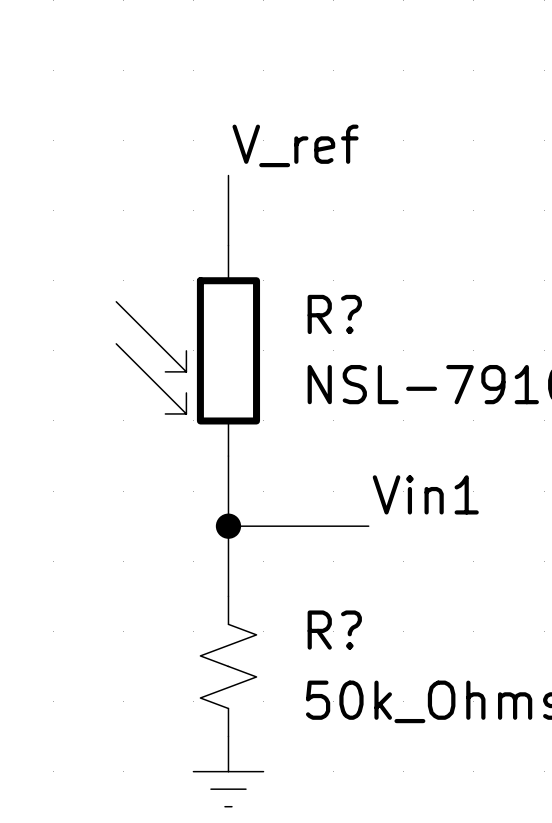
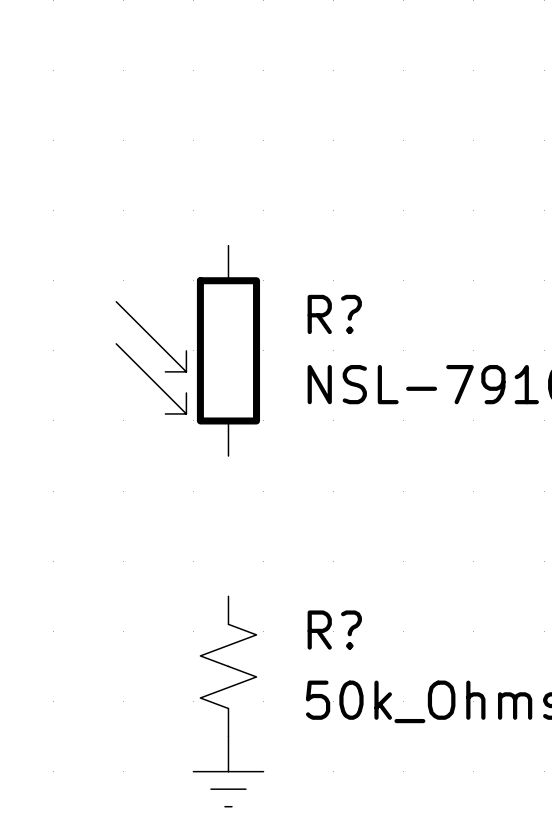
label: V_ref (295, 145) -> none
wire: (228, 175) (228, 245) -> none
wire: (228, 456) (228, 596) -> none
label: Vin1 (425, 494) -> none
wire: (228, 526) (368, 526) -> none
junction: (228, 526) -> none

